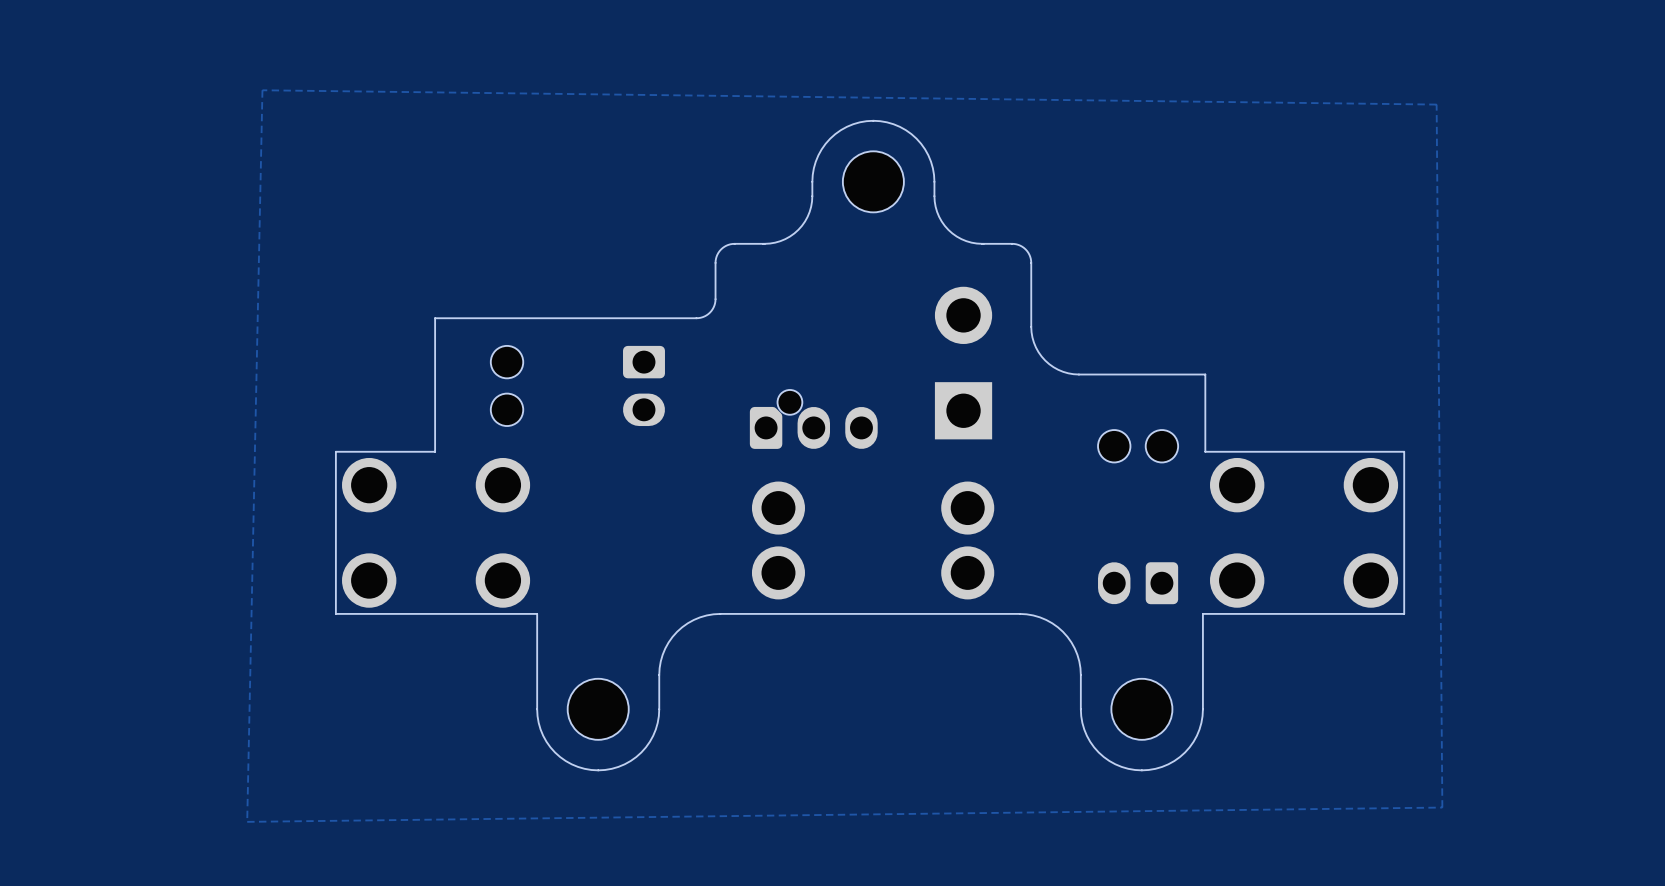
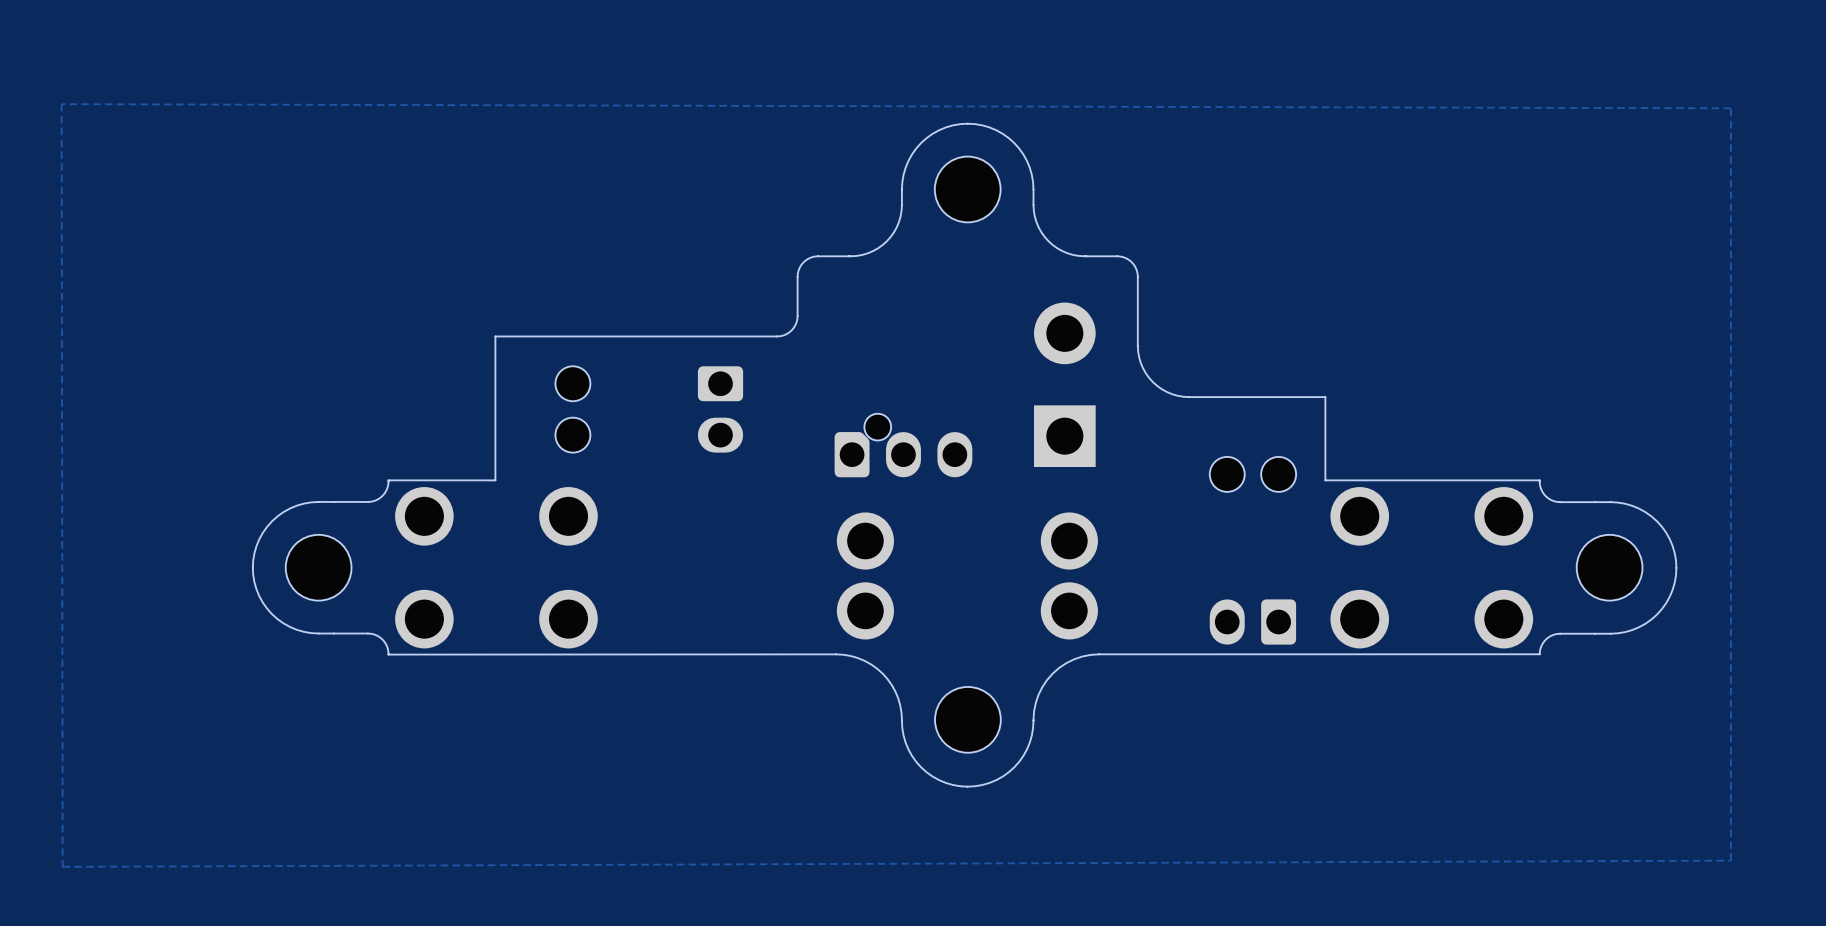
zone outline: (262, 90) (1436, 104) (1442, 807) (247, 821) (262, 90) -> (61, 104) (1730, 108) (1730, 860) (62, 866) (61, 104)
board edge: (335, 452) (335, 612) -> (388, 481) (385, 492) (374, 500) (311, 502) (296, 505) (283, 512) (272, 521) (262, 532) (256, 546) (252, 567) (254, 582) (259, 596) (267, 608) (283, 623) (296, 629) (311, 633) (374, 634) (384, 641) (388, 654)
board edge: (1404, 452) (1404, 613) (1202, 613) (1202, 709) (1199, 729) (1189, 747) (1179, 757) (1168, 764) (1148, 769) (1128, 768) (1115, 764) (1103, 757) (1094, 747) (1086, 735) (1082, 722) (1080, 668) (1074, 648) (1067, 636) (1057, 627) (1046, 619) (1033, 615) (720, 613) (700, 617) (687, 623) (677, 631) (668, 642) (662, 654) (659, 668) (658, 716) (655, 729) (649, 741) (641, 752) (624, 764) (611, 768) (598, 770) (584, 768) (565, 761) (550, 747) (540, 729) (537, 709) (537, 613) (335, 613) -> (1539, 481) (1542, 492) (1553, 501) (1625, 503) (1645, 512) (1662, 526) (1672, 546) (1676, 560) (1676, 575) (1672, 589) (1666, 602) (1651, 619) (1639, 627) (1617, 633) (1553, 634) (1544, 641) (1539, 654) (1099, 654) (1082, 656) (1059, 667) (1042, 687) (1035, 703) (1029, 742) (1019, 761) (1008, 772) (996, 780) (975, 786) (960, 786) (945, 782) (932, 776) (921, 767) (912, 755) (905, 742) (900, 705) (891, 685) (877, 668) (864, 660) (850, 656) (836, 654) (388, 654)
part: none -> (318, 567)
part: none -> (1609, 567)
part: none -> (967, 719)
part: (598, 709) -> none
part: (1141, 709) -> none

